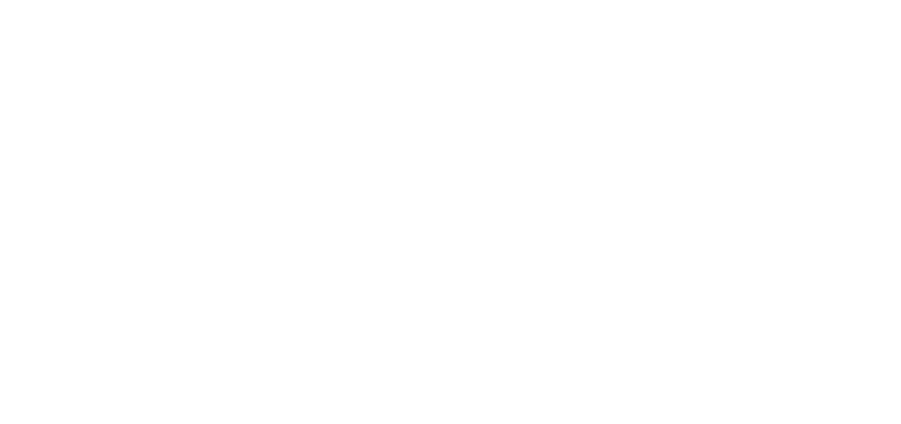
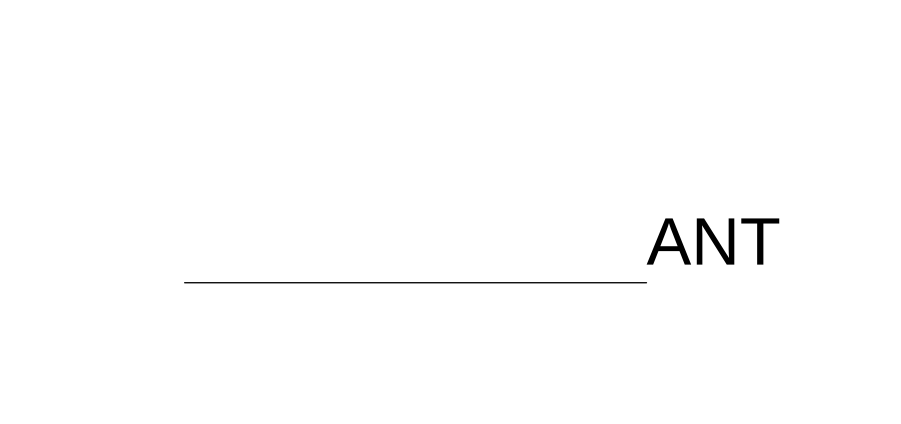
label: none -> ANT (712, 241)
wire: none -> (184, 282) (646, 282)

